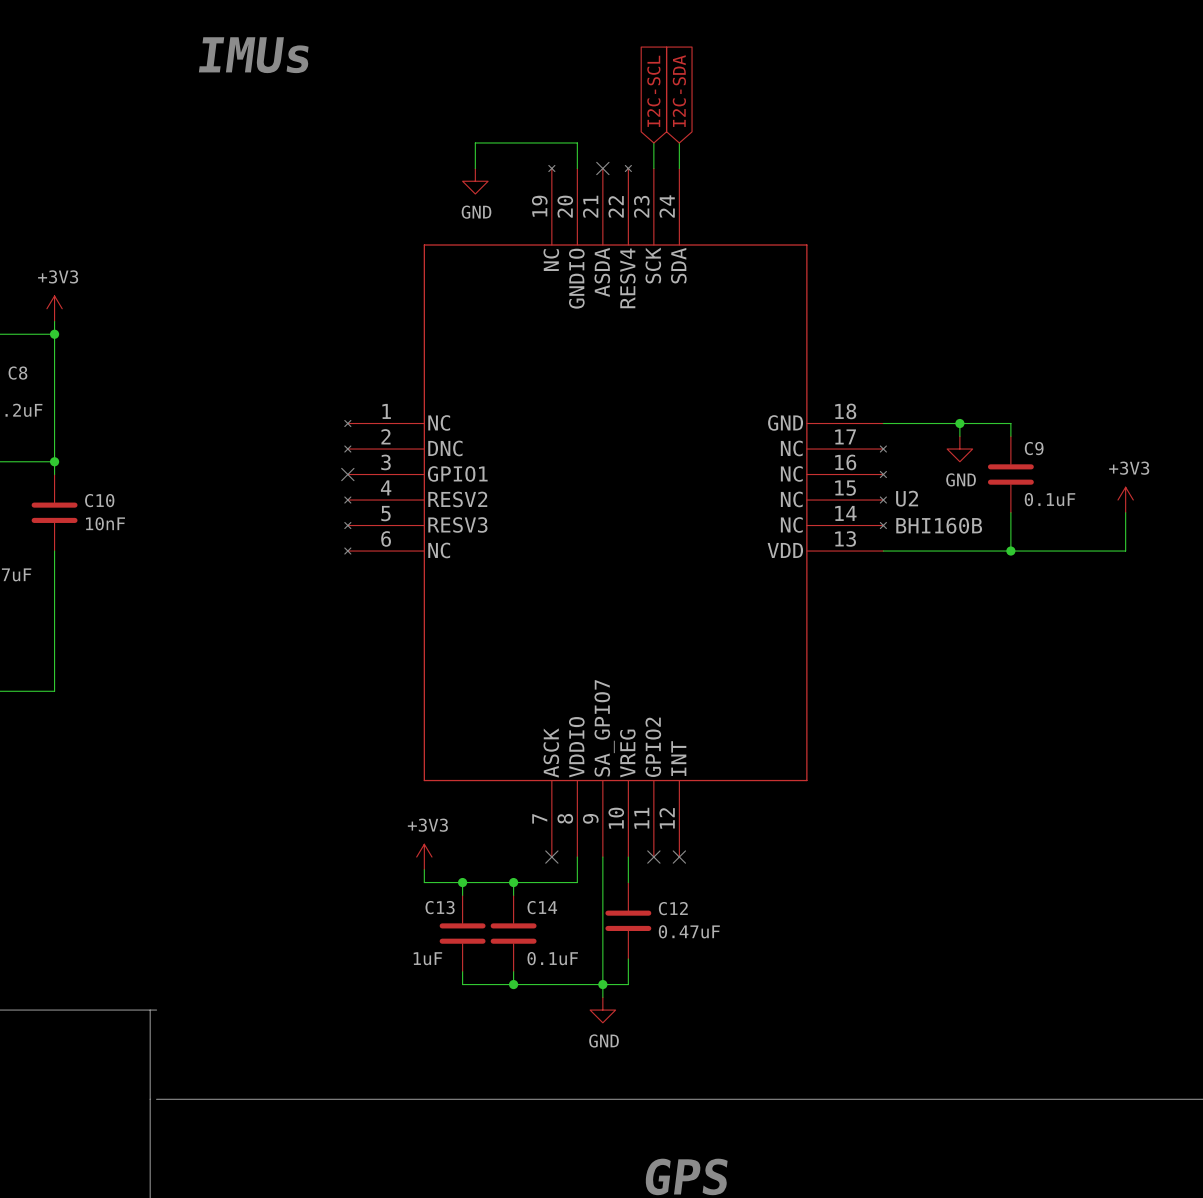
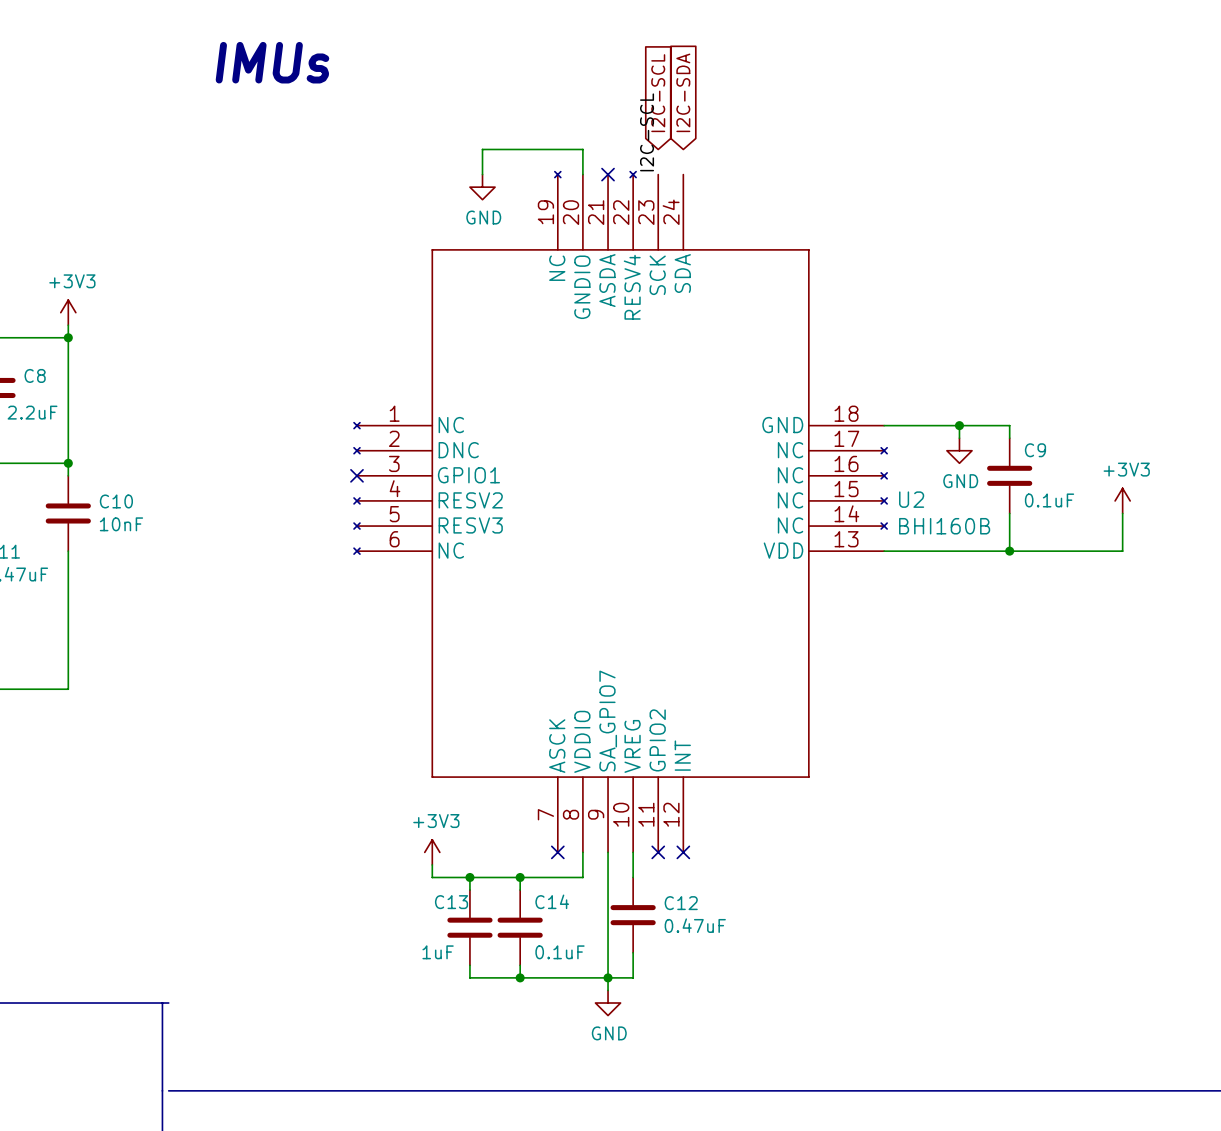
label: none -> I2C-SCL (647, 132)
wire: (653, 142) (653, 168) -> none
wire: (679, 142) (679, 168) -> none

